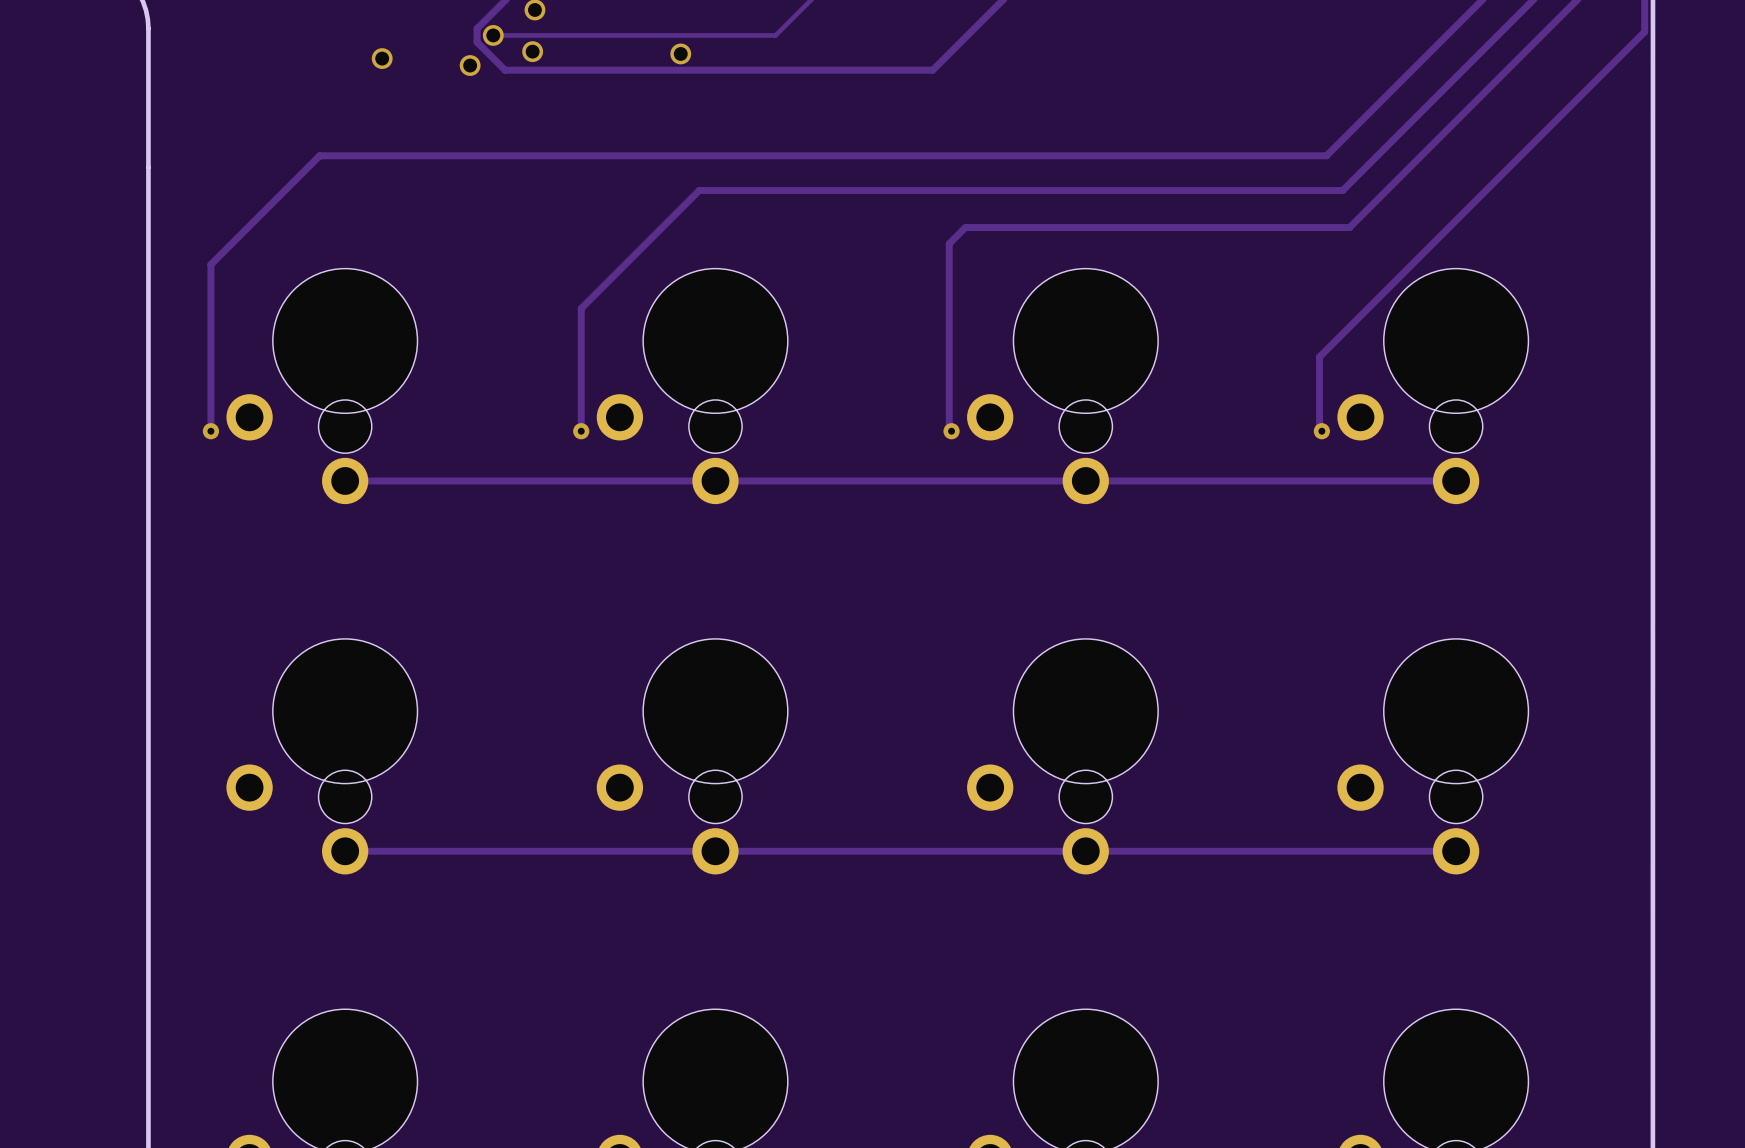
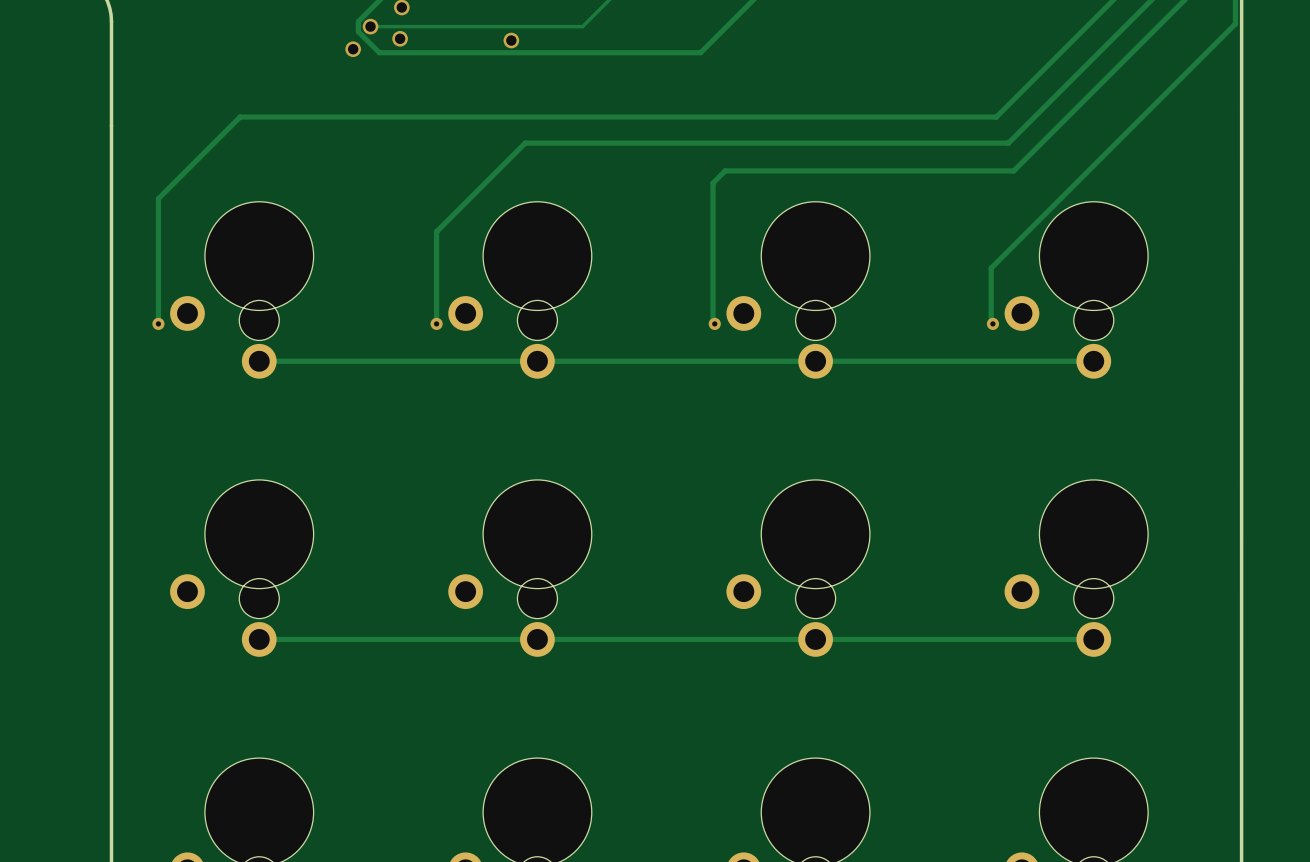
via: (382, 58) -> none

